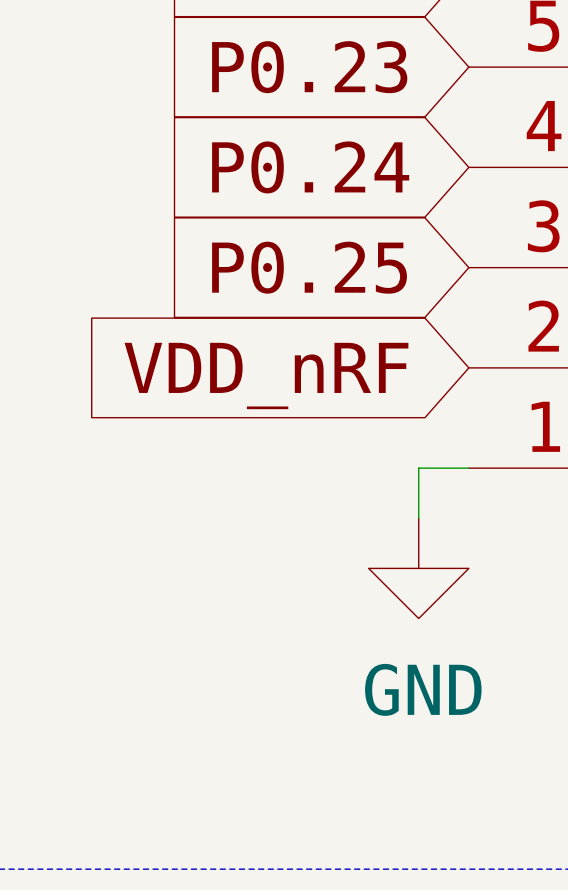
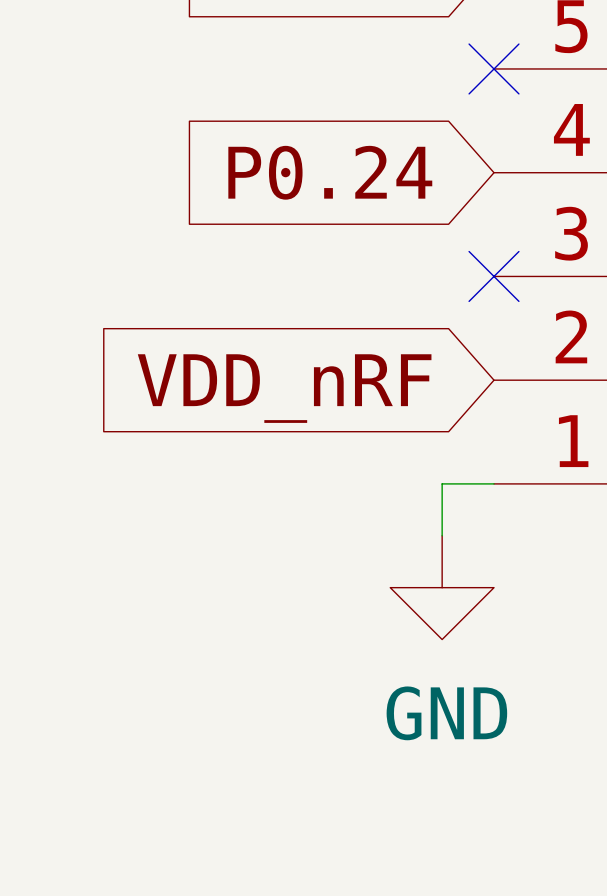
global label: P0.23 (309, 67) -> none
no-connect mark: none -> (494, 68)
global label: P0.25 (309, 267) -> none
no-connect mark: none -> (494, 276)

